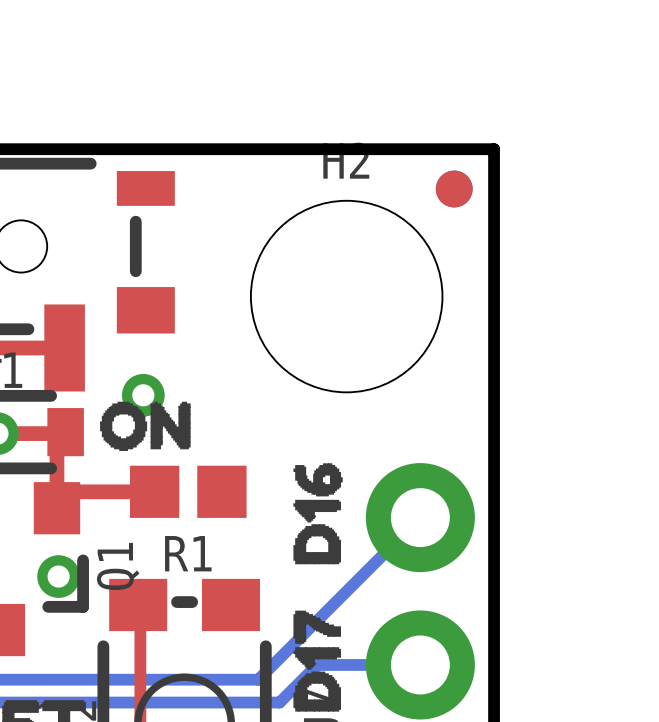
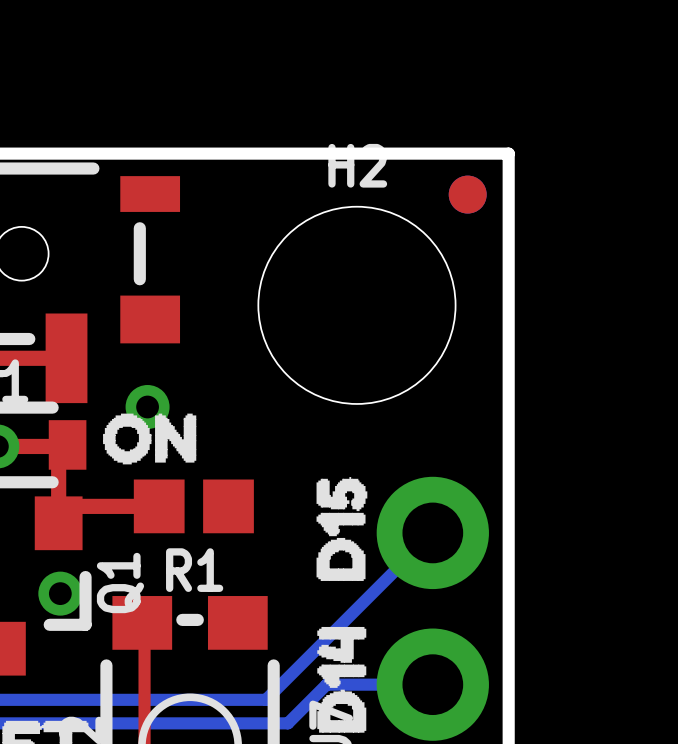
drawing shape: [293, 463, 343, 565] -> [316, 477, 368, 581]
drawing shape: [293, 610, 342, 712] -> [317, 626, 367, 733]

